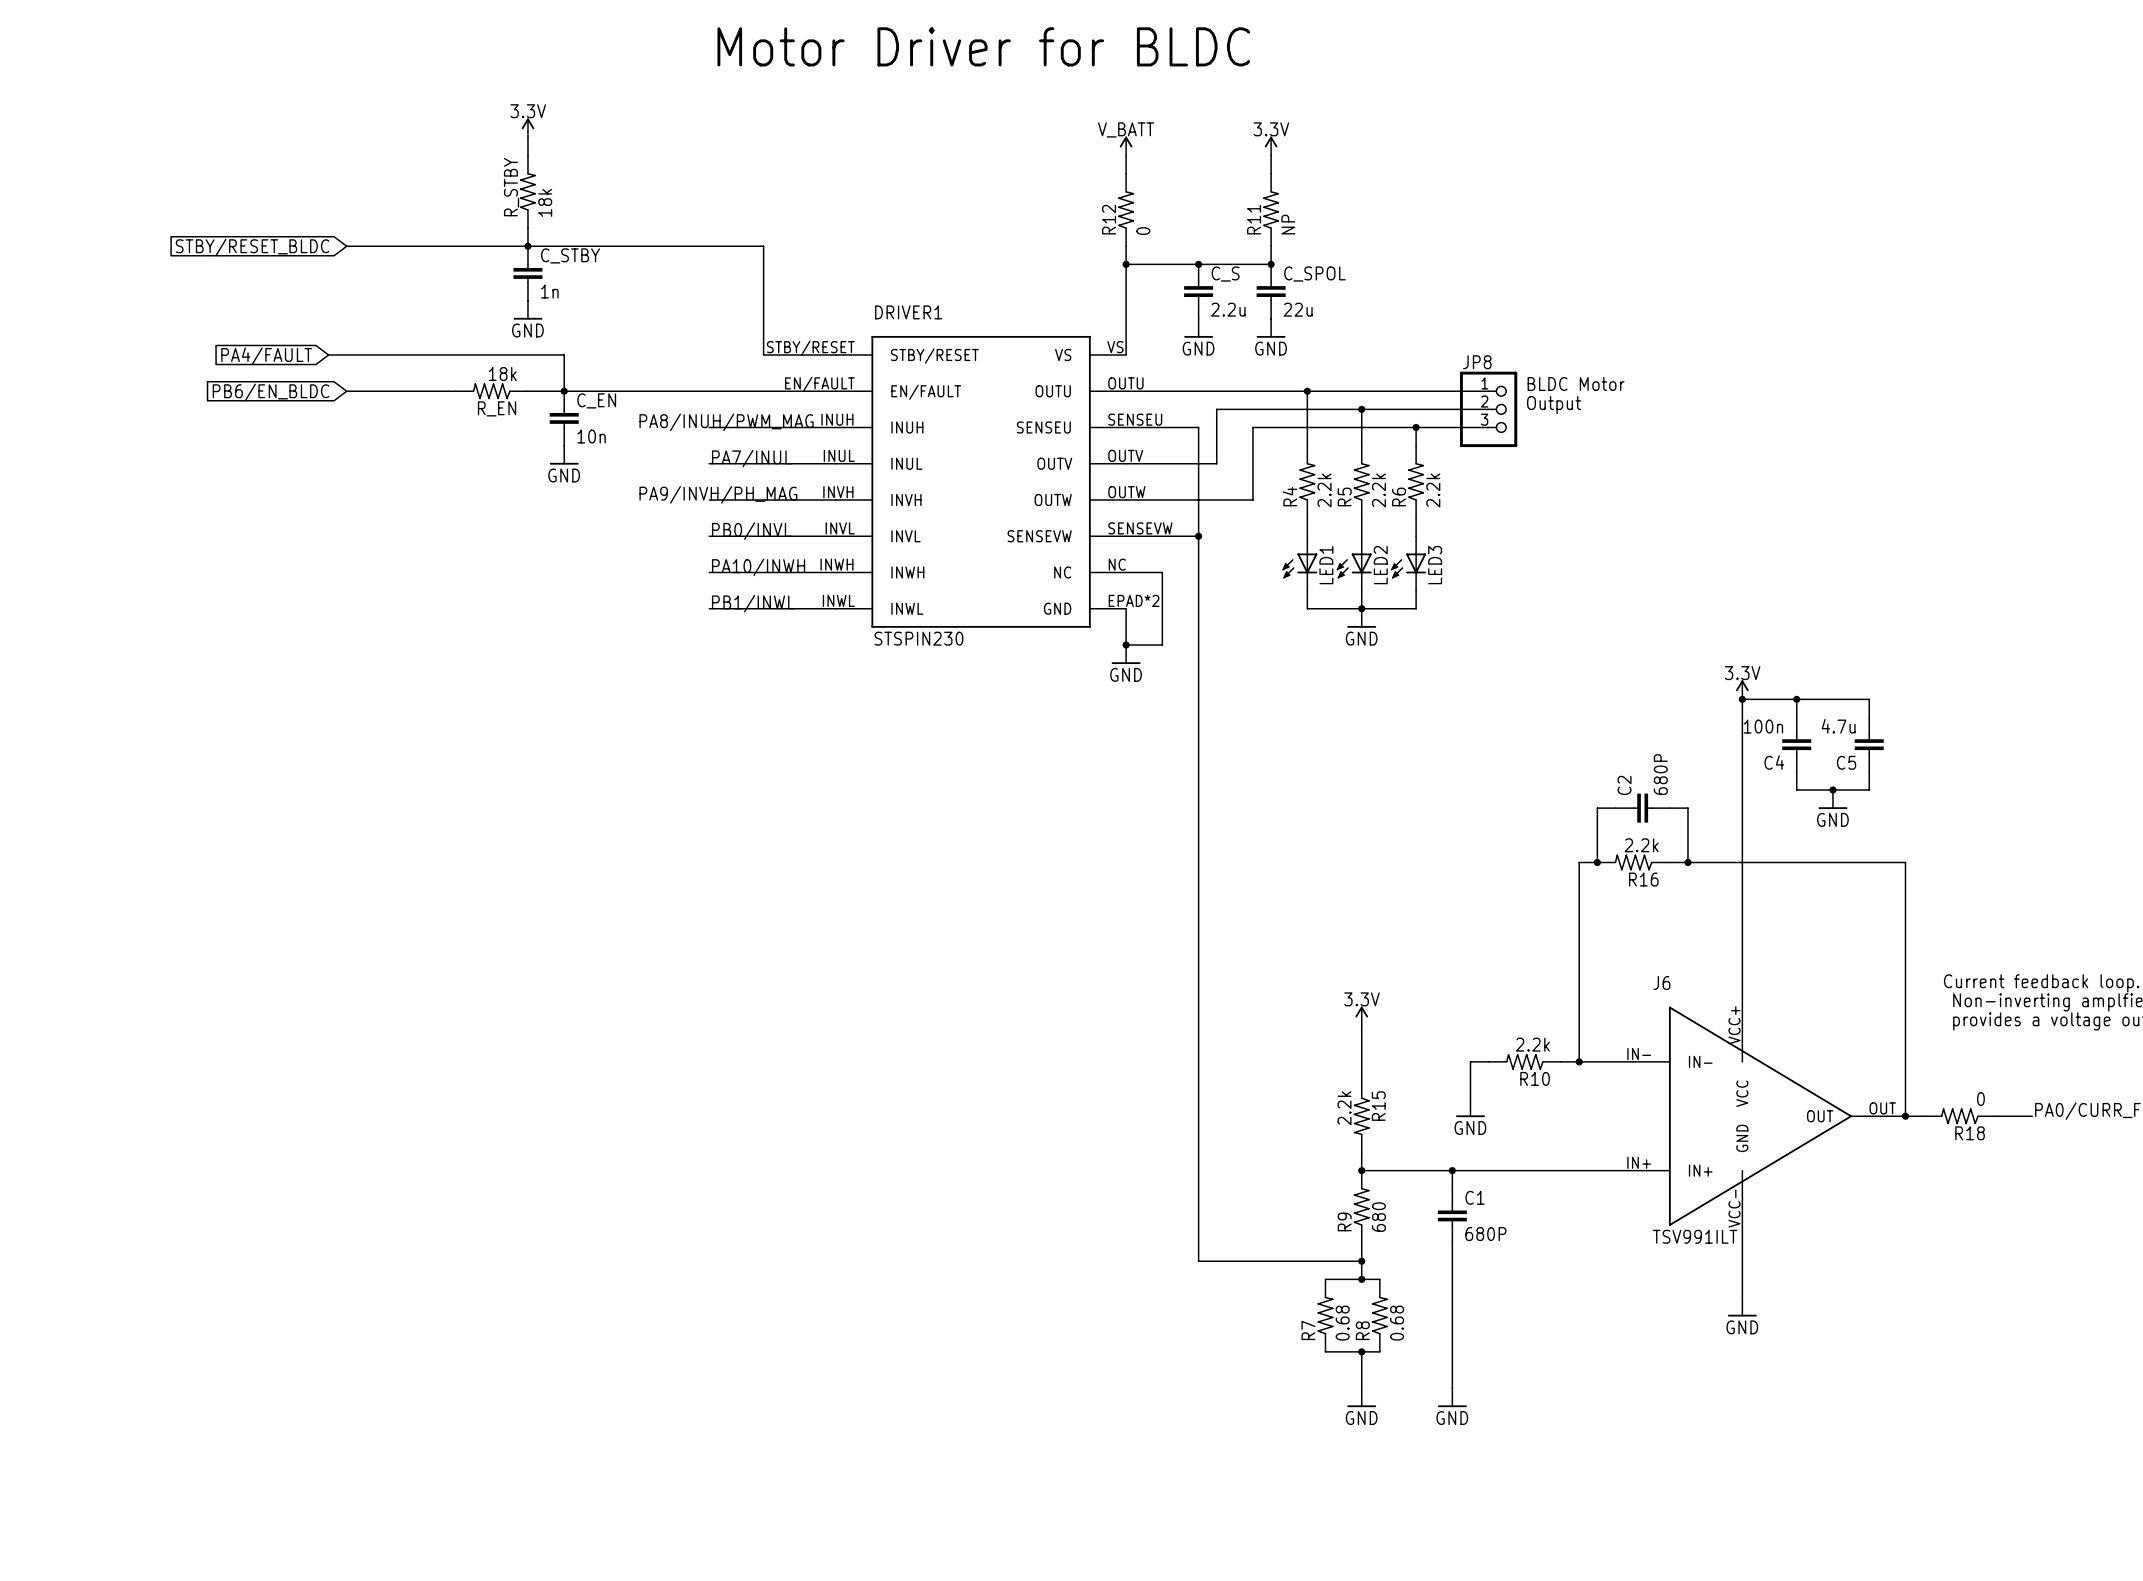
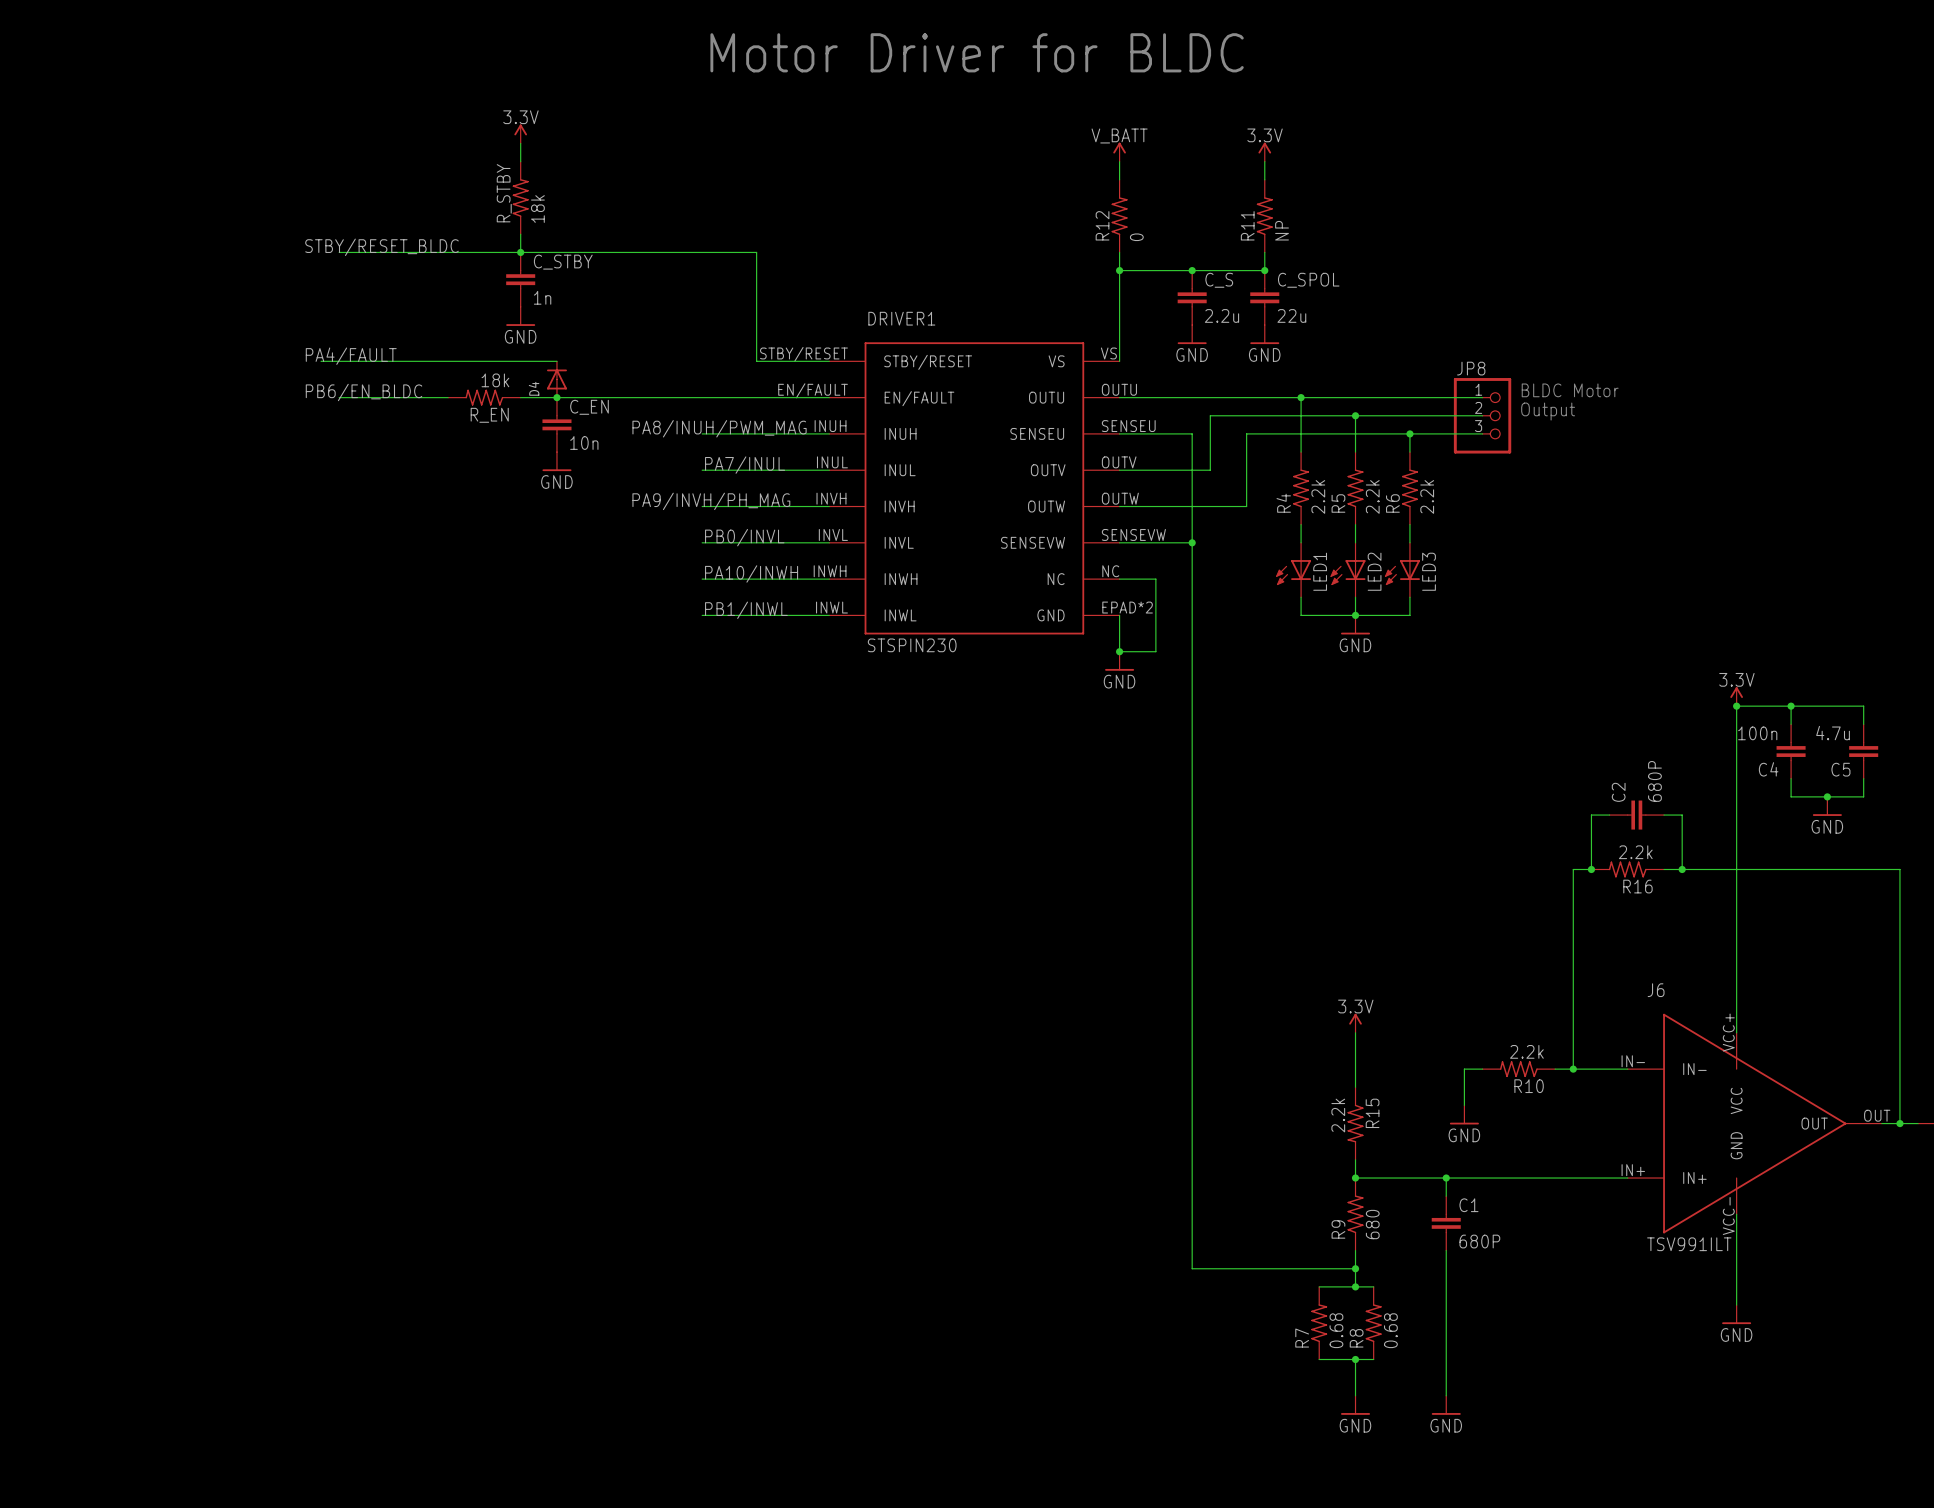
label: none -> STBY/RESET_BLDC (381, 247)
global label: STBY/RESET_BLDC (252, 247) -> none
label: none -> PA4/FAULT (351, 356)
global label: PA4/FAULT (266, 356) -> none
D4: none -> (556, 379)
label: none -> PB6/EN_BLDC (364, 392)
global label: PB6/EN_BLDC (271, 392) -> none

